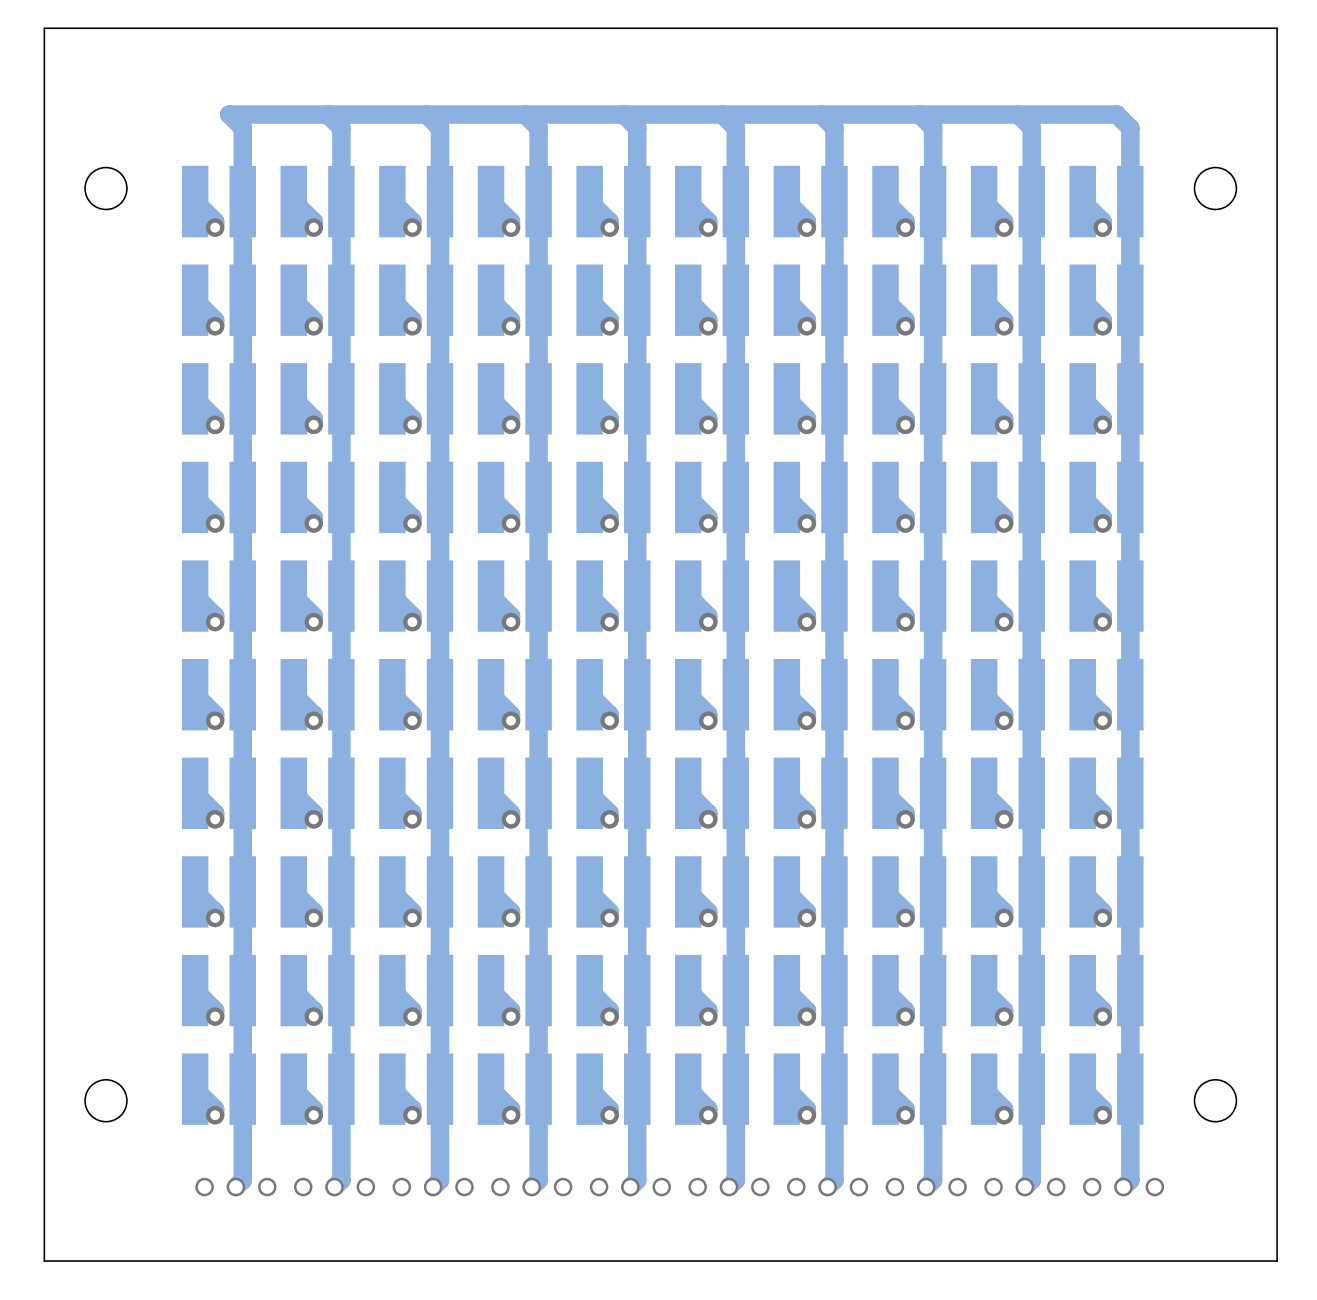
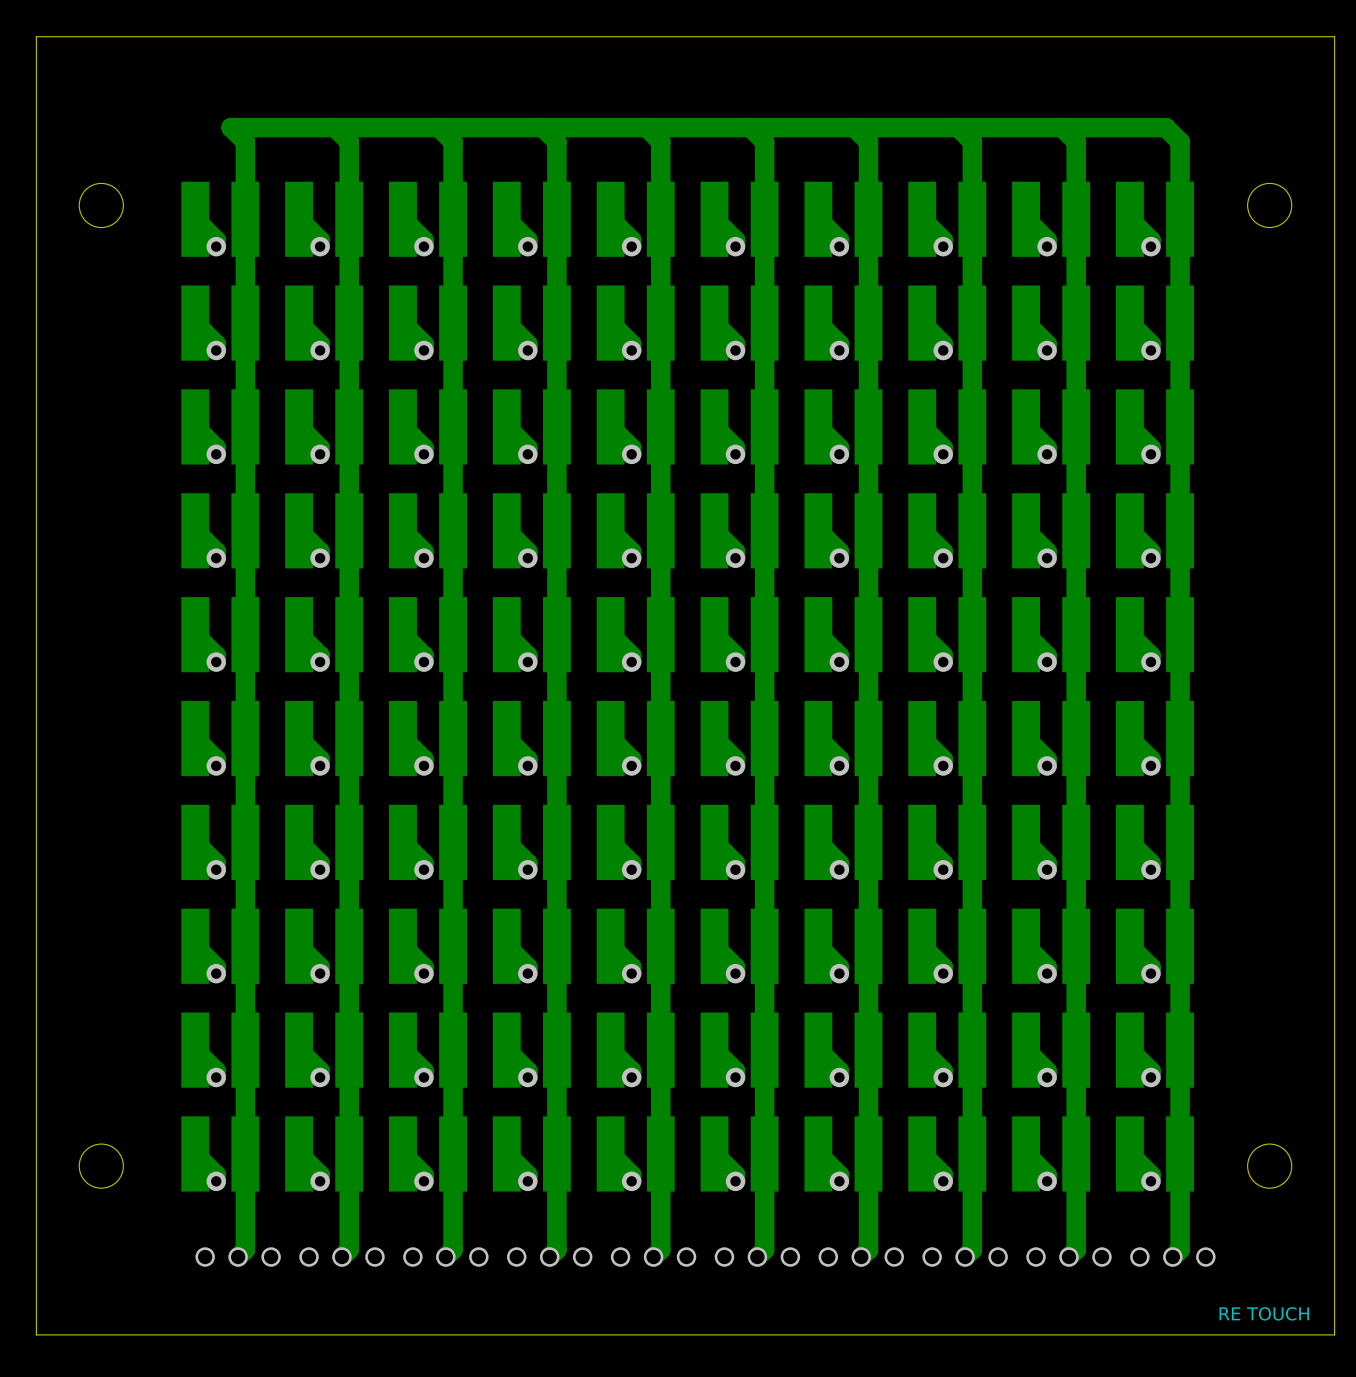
text: none -> RE TOUCH (1264, 1313)

